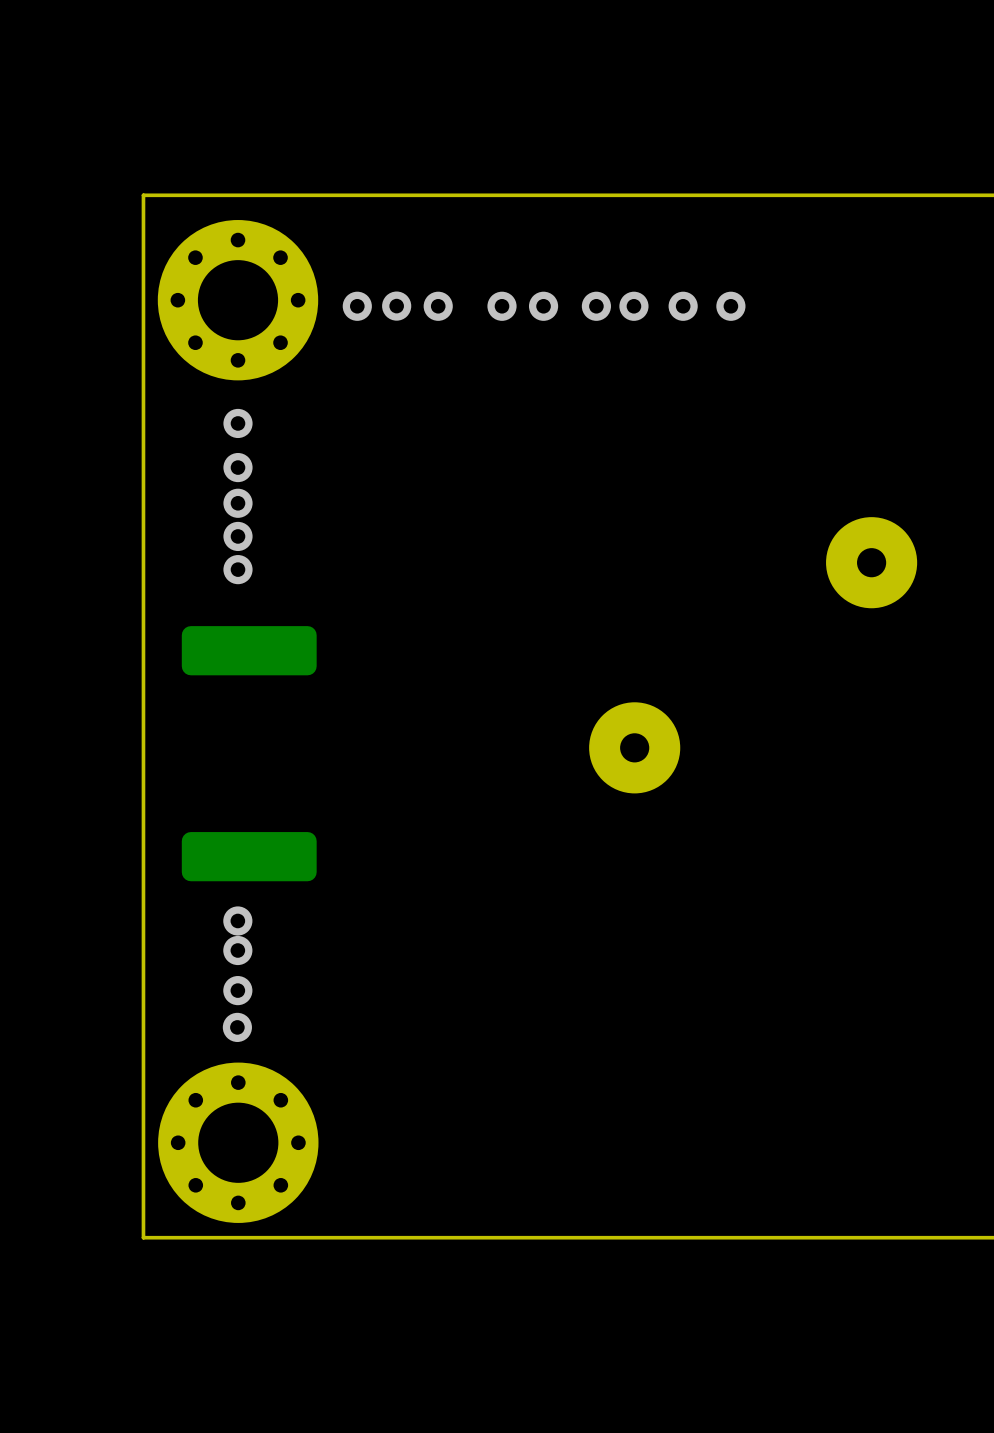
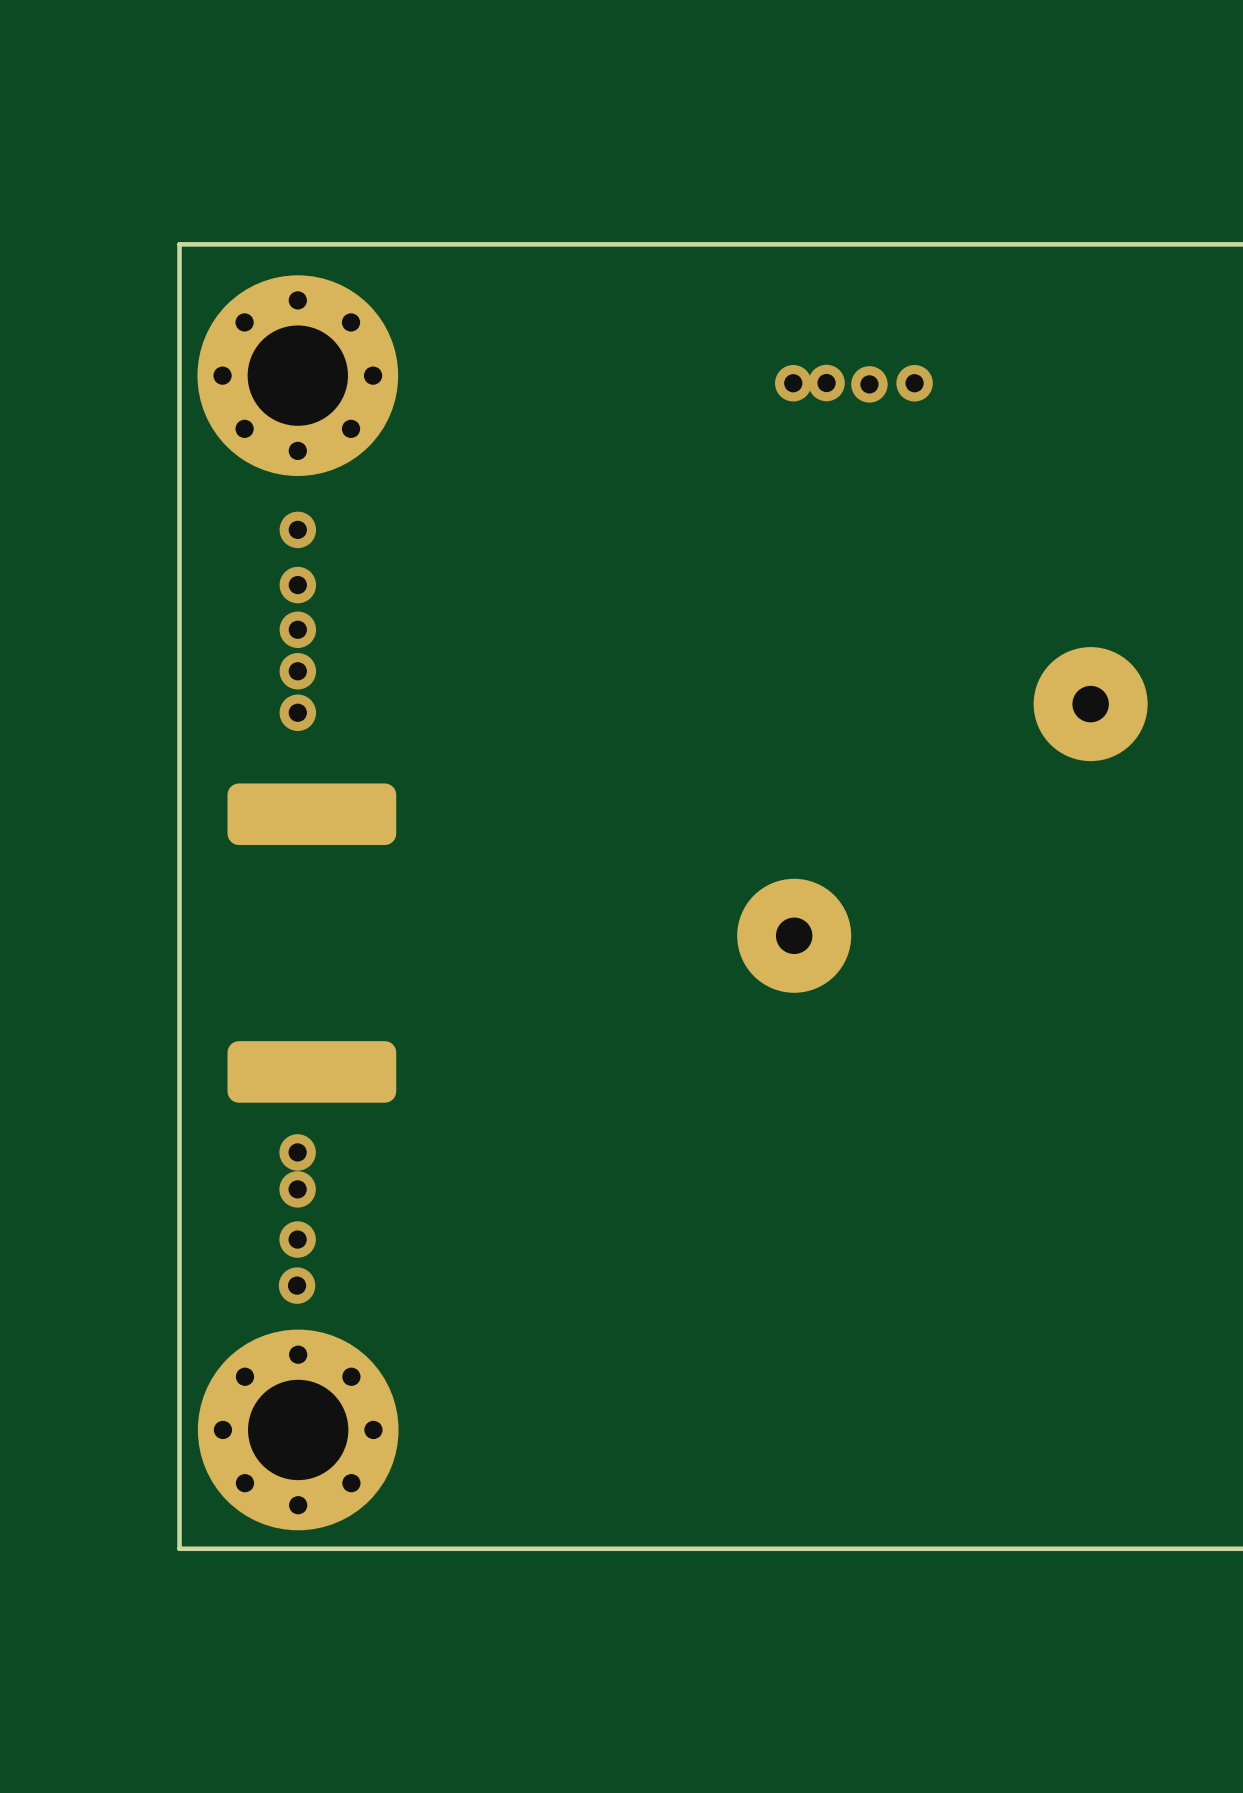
via: (357, 306) -> none
via: (396, 306) -> none
via: (438, 306) -> none
via: (502, 306) -> none
via: (543, 306) -> none
via: (596, 306) -> none
via: none -> (826, 383)
via: (683, 306) -> none
via: none -> (869, 384)

